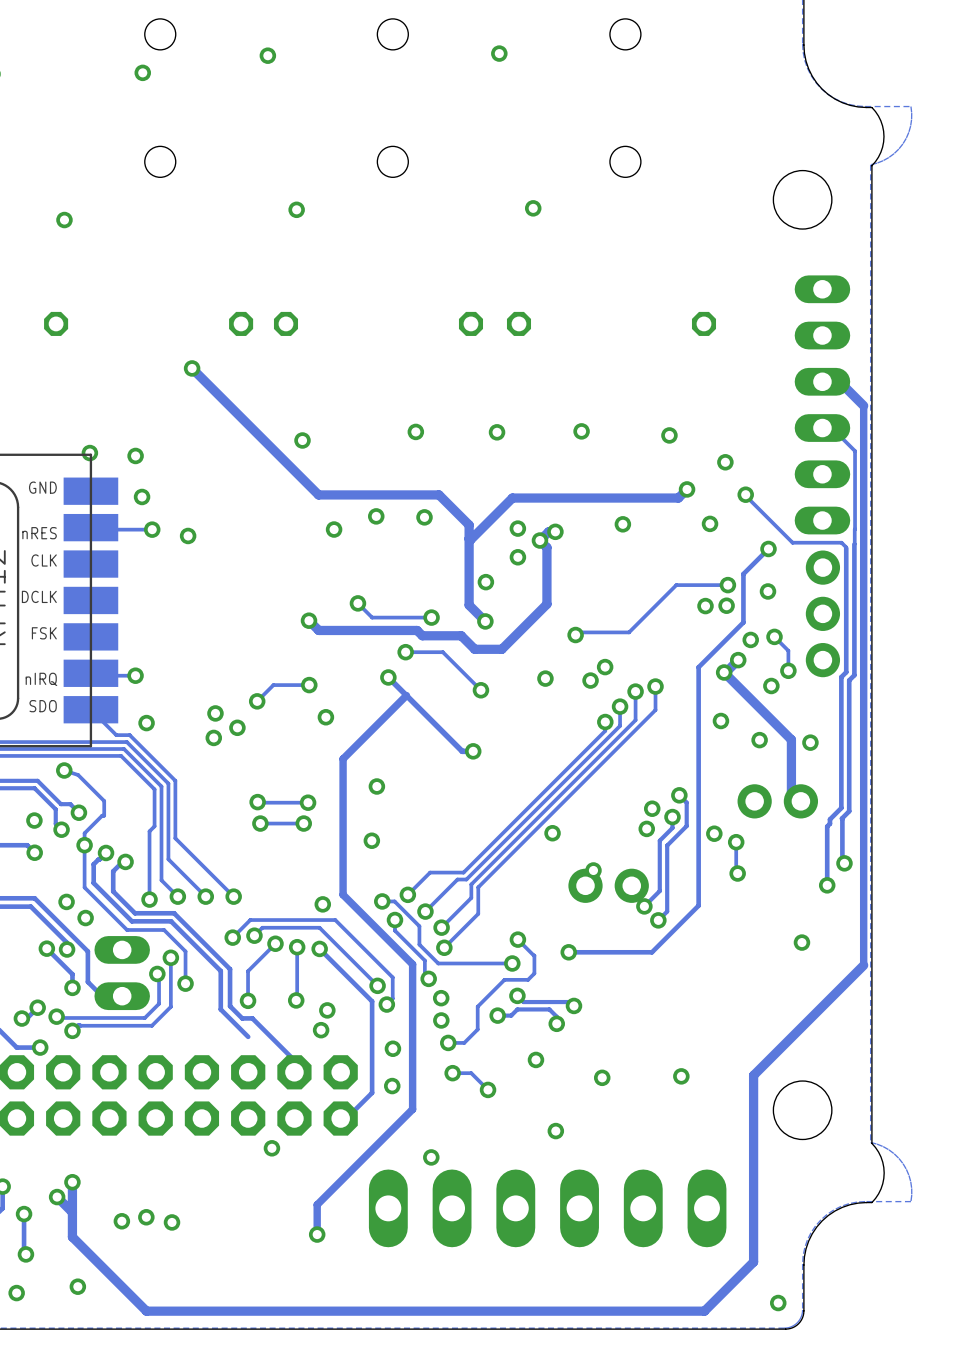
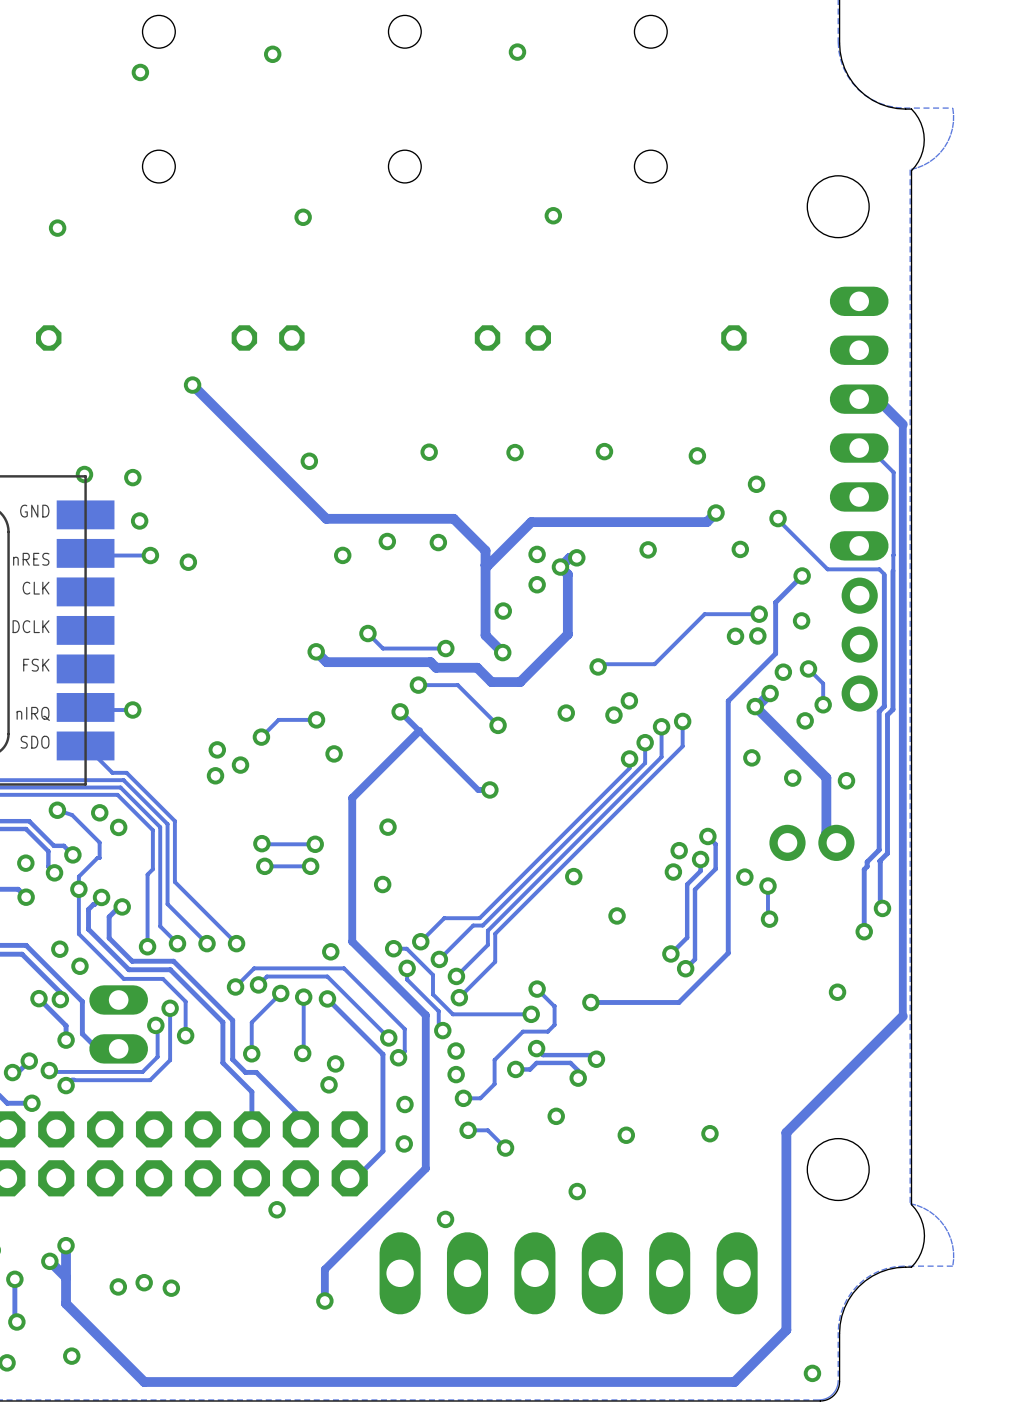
via: (146, 723) -> none
via: none -> (99, 812)
via: none -> (118, 827)
part: (608, 885) -> none
track: none -> (251, 1091) (251, 1129)

